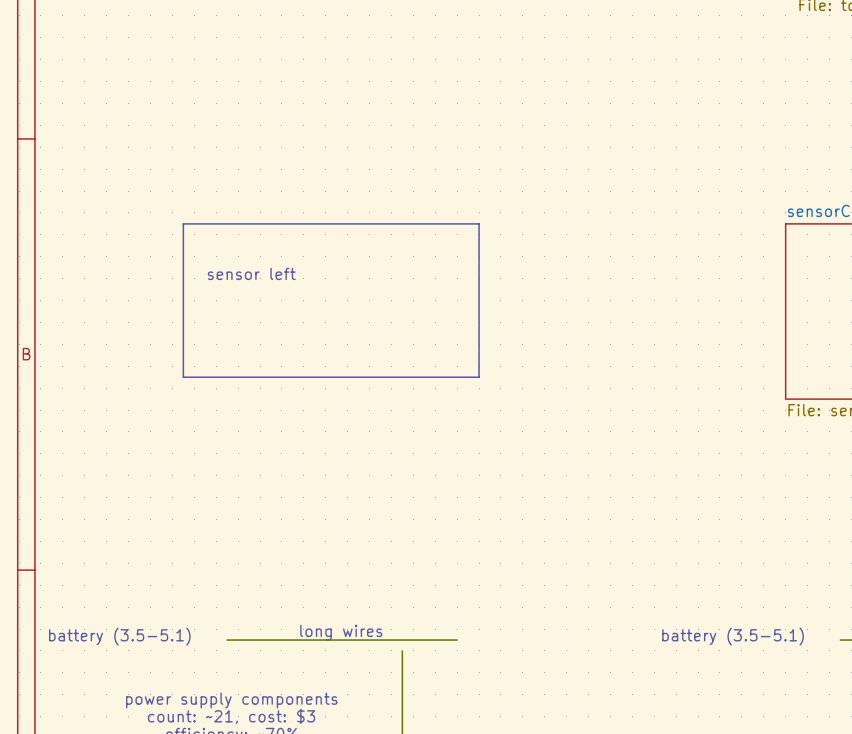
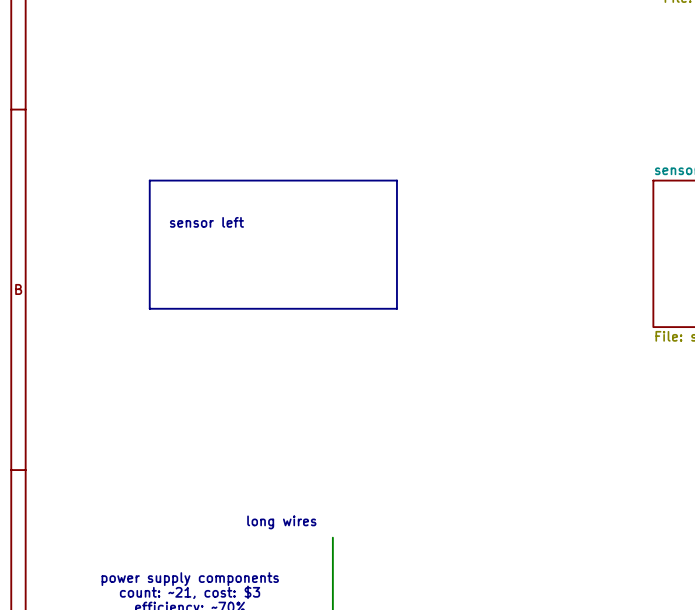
text: battery (3.5-5.1) (119, 636) -> none
text: battery (3.5-5.1) (733, 636) -> none
wire: (227, 640) (457, 640) -> none

